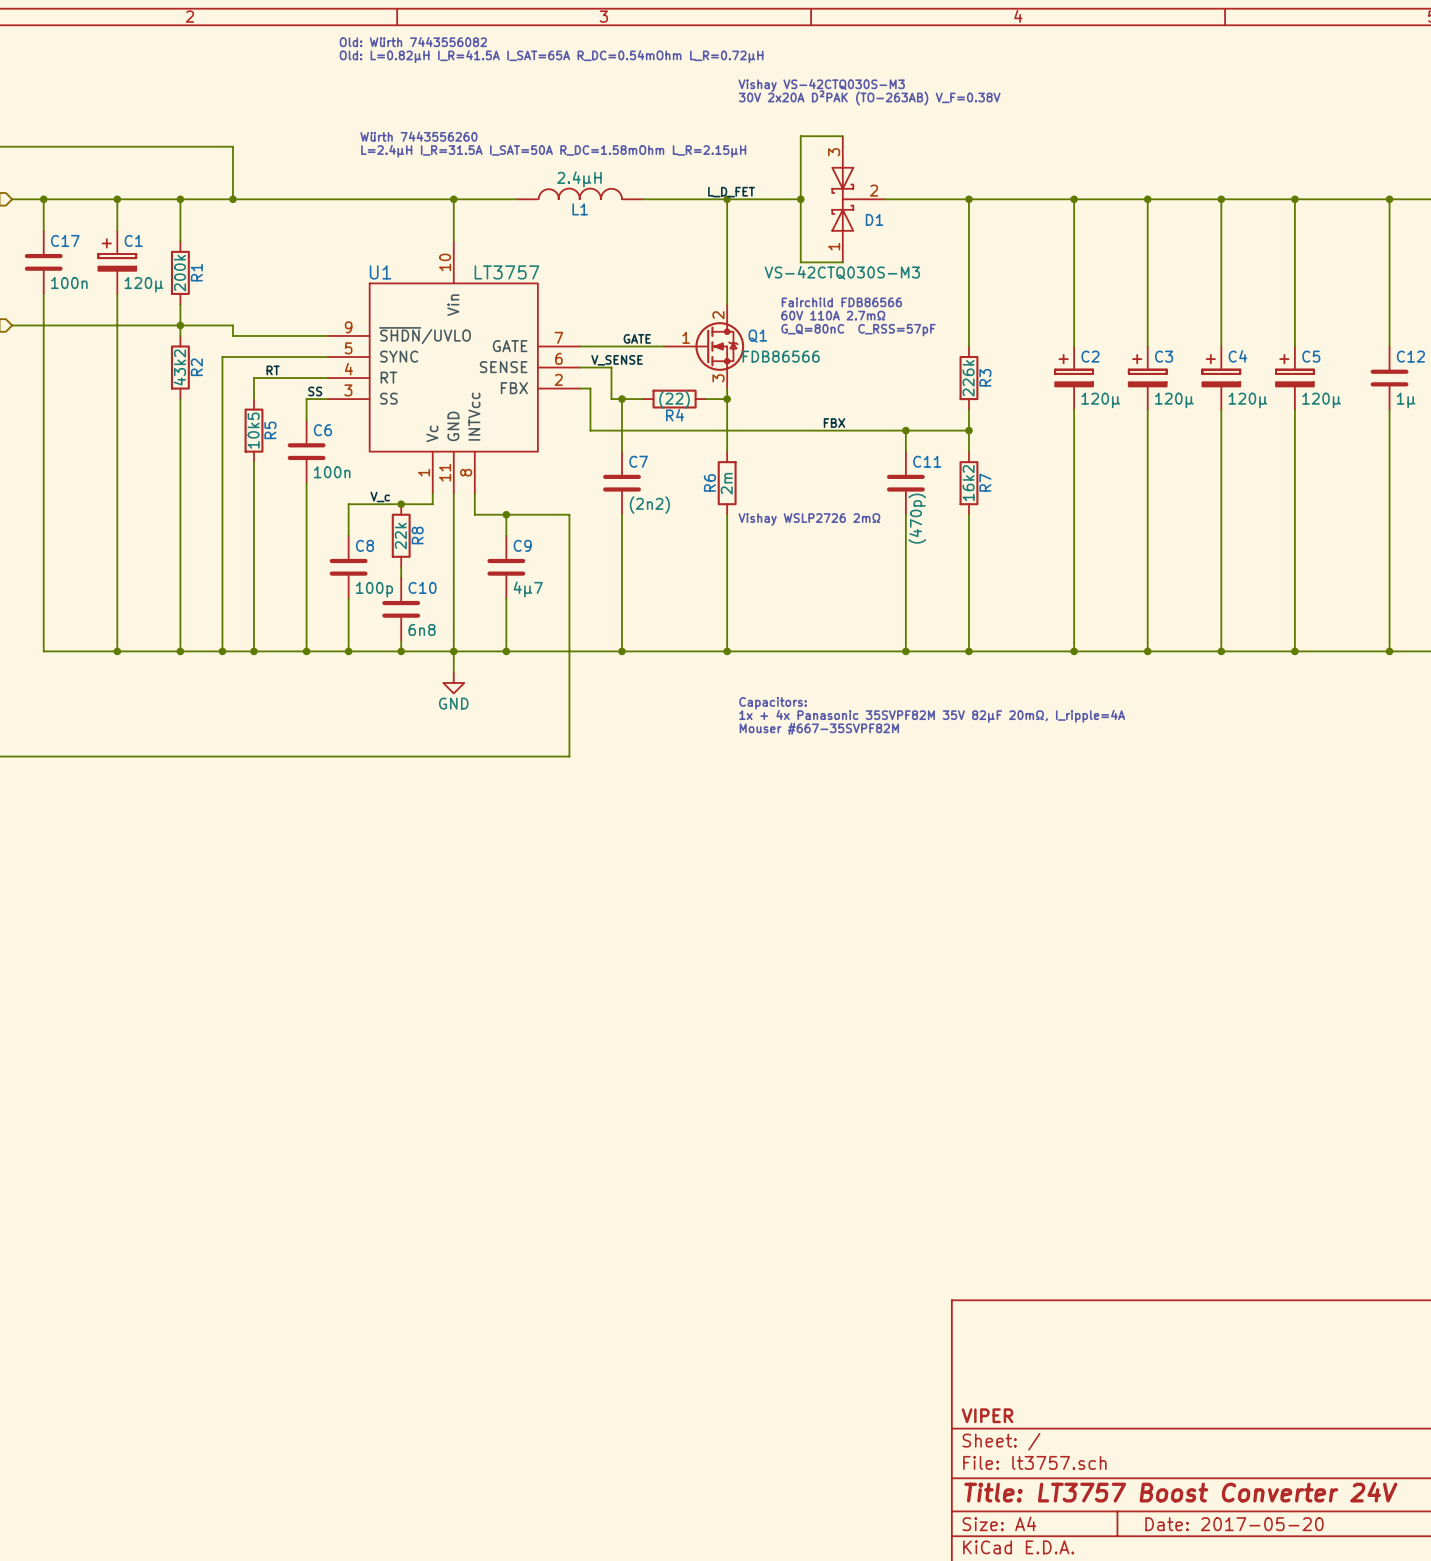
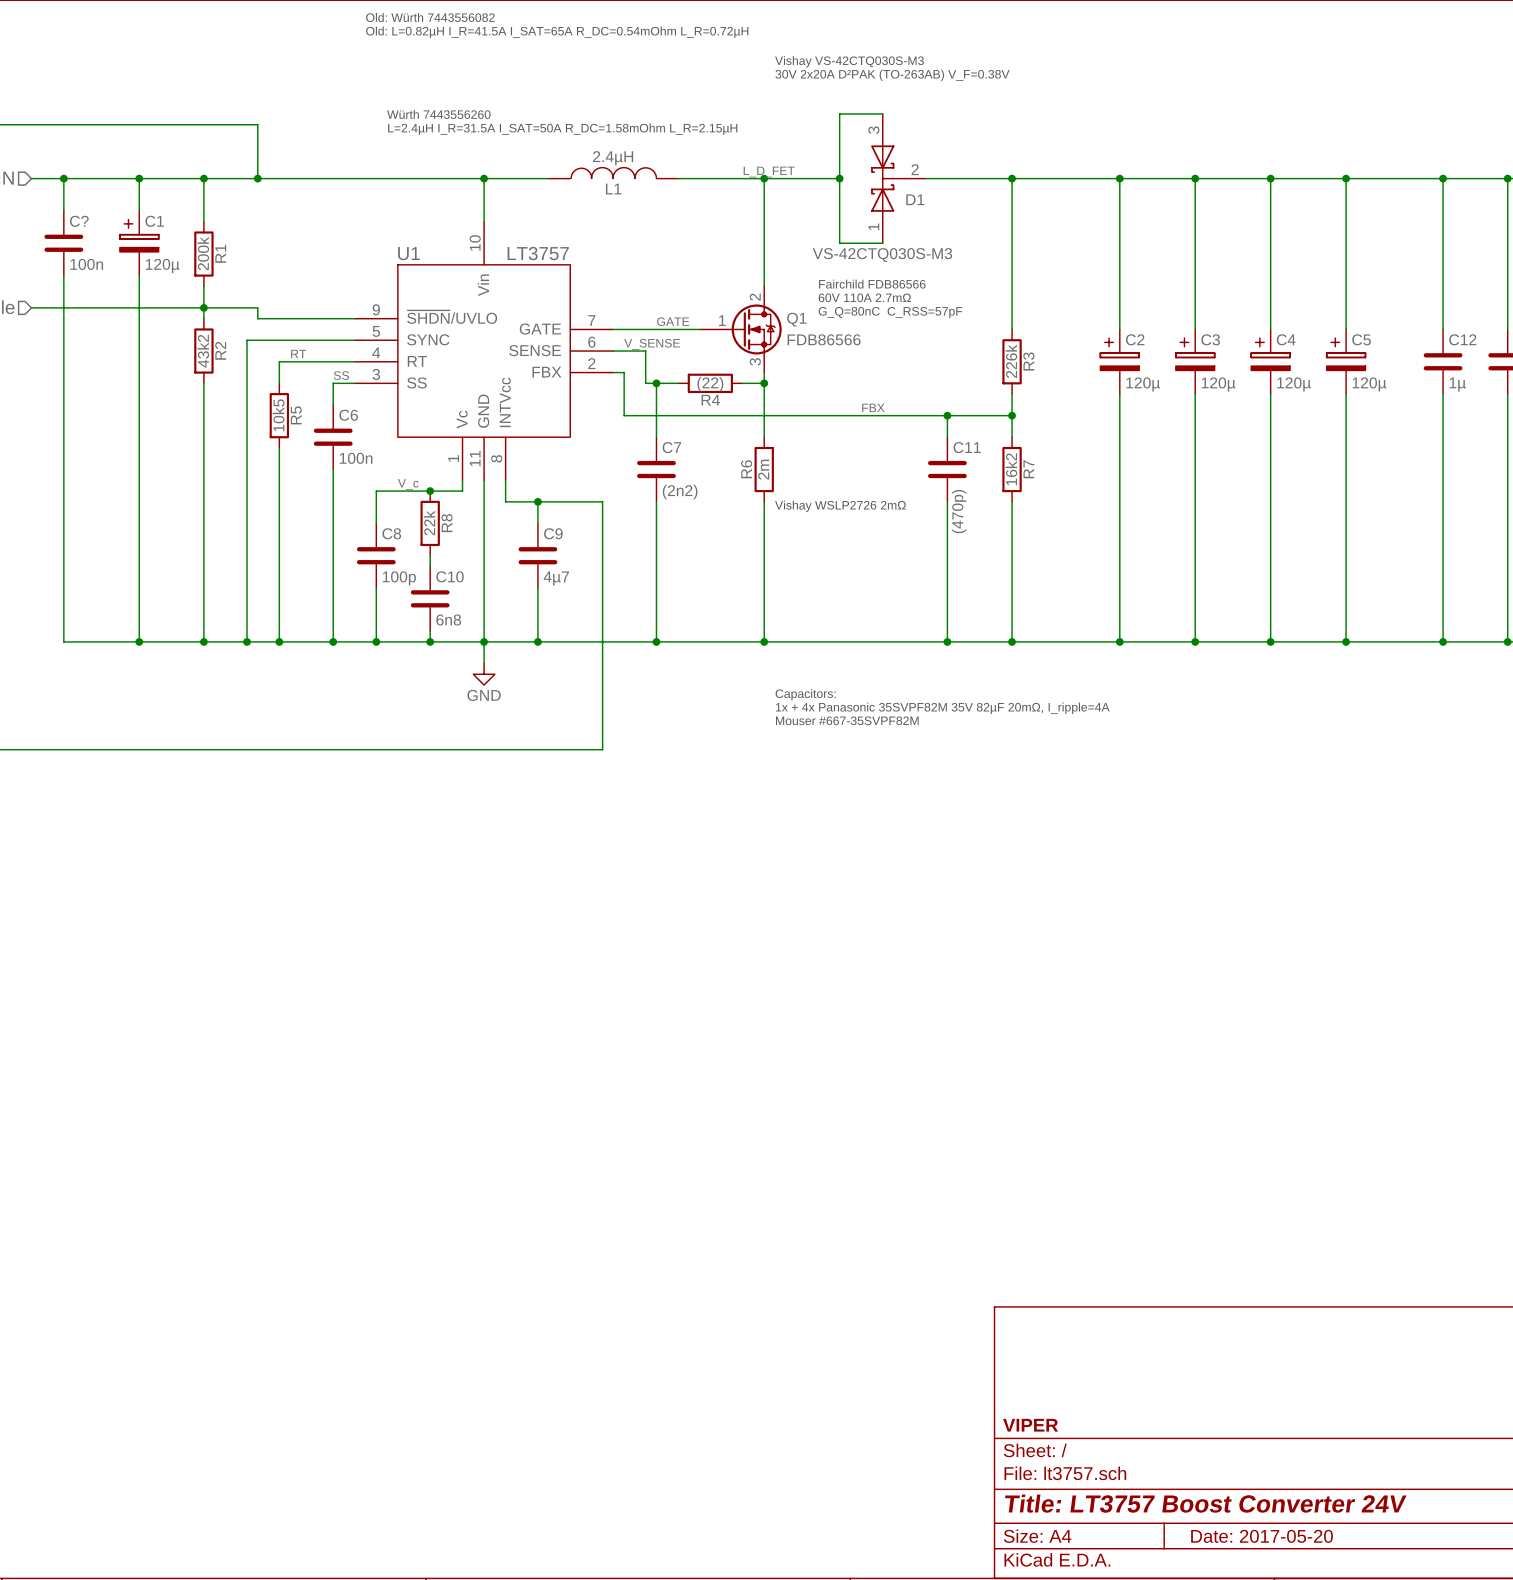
C17 name: C17 (65, 240) -> C? (79, 221)

